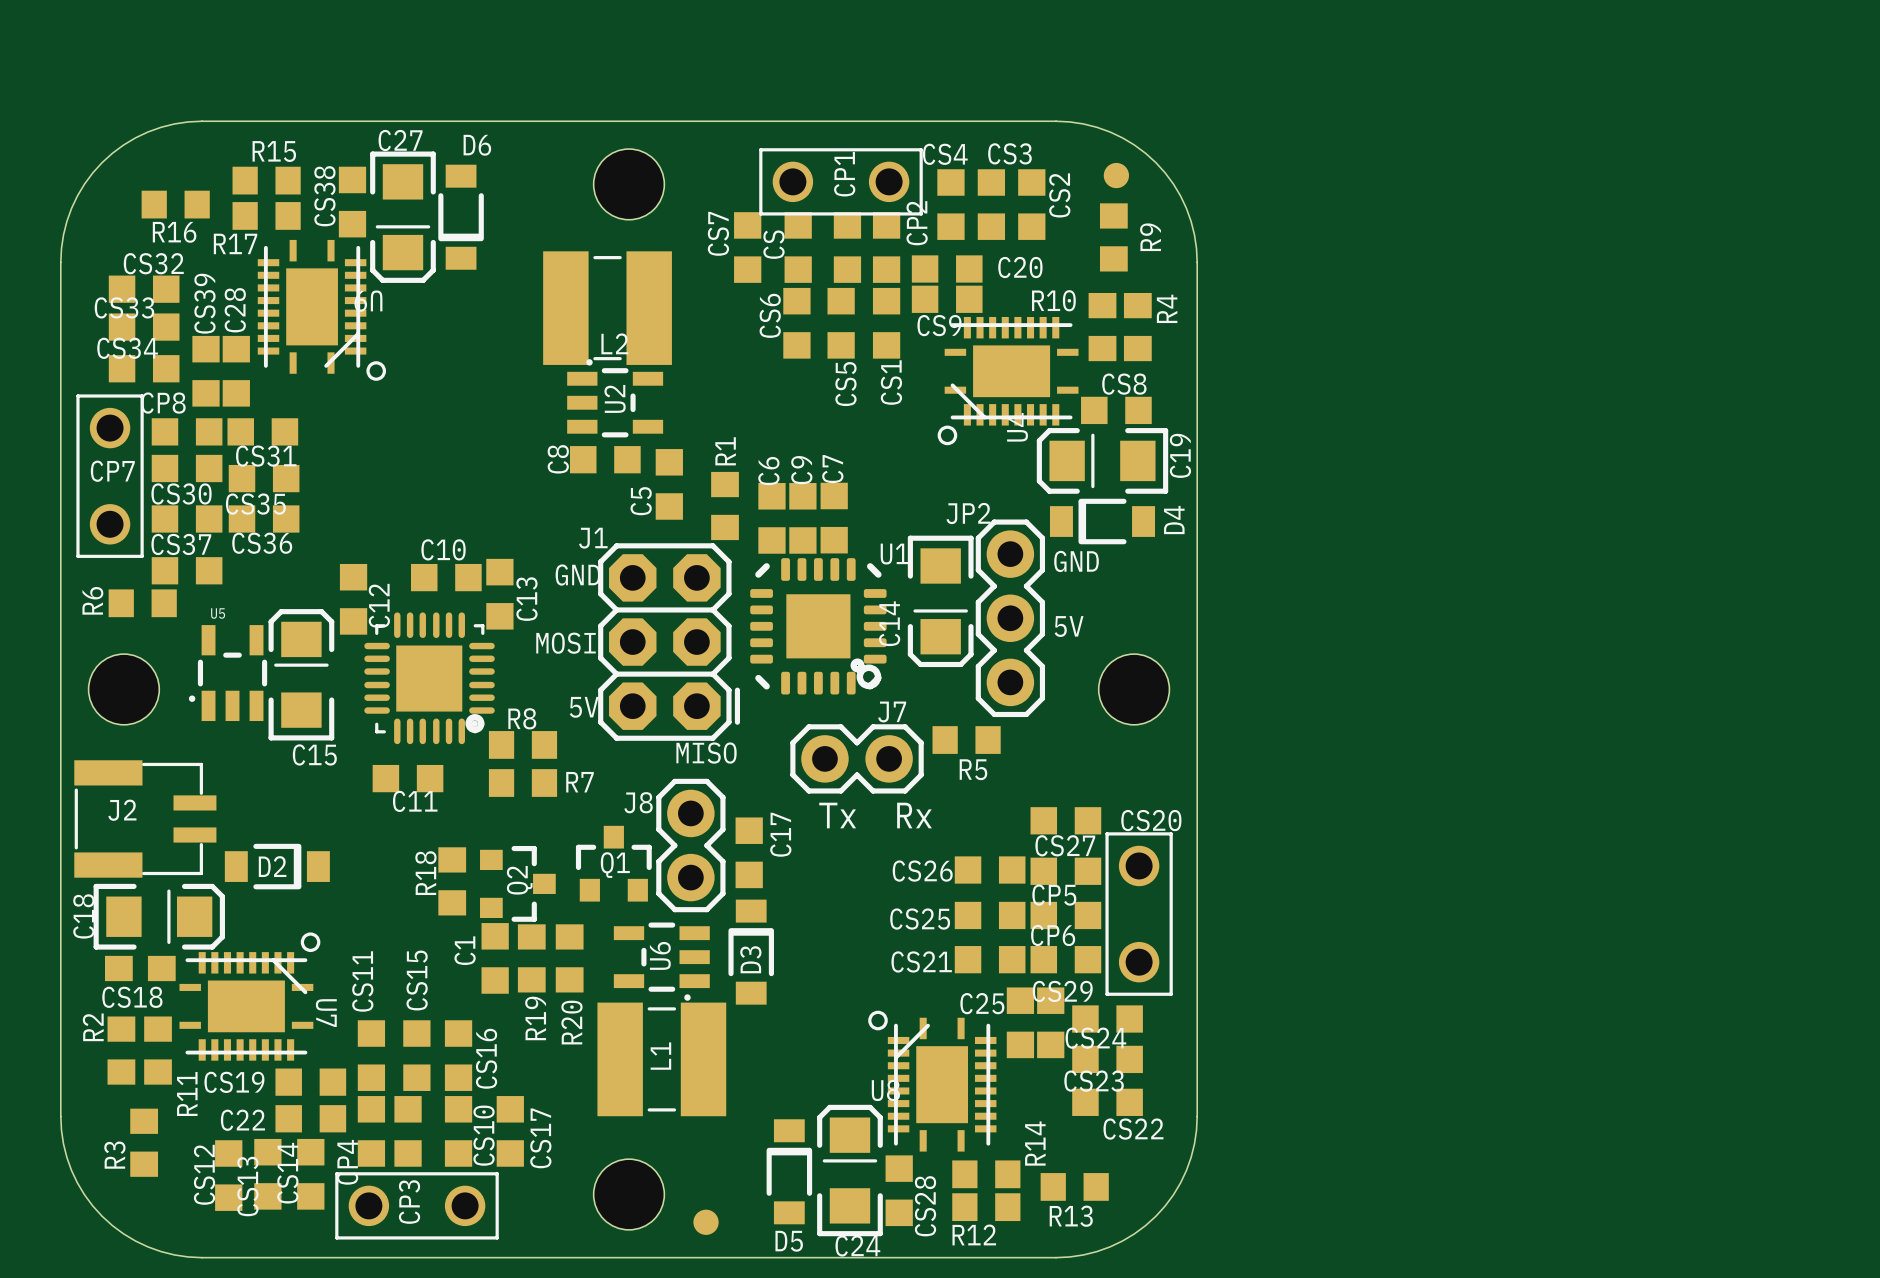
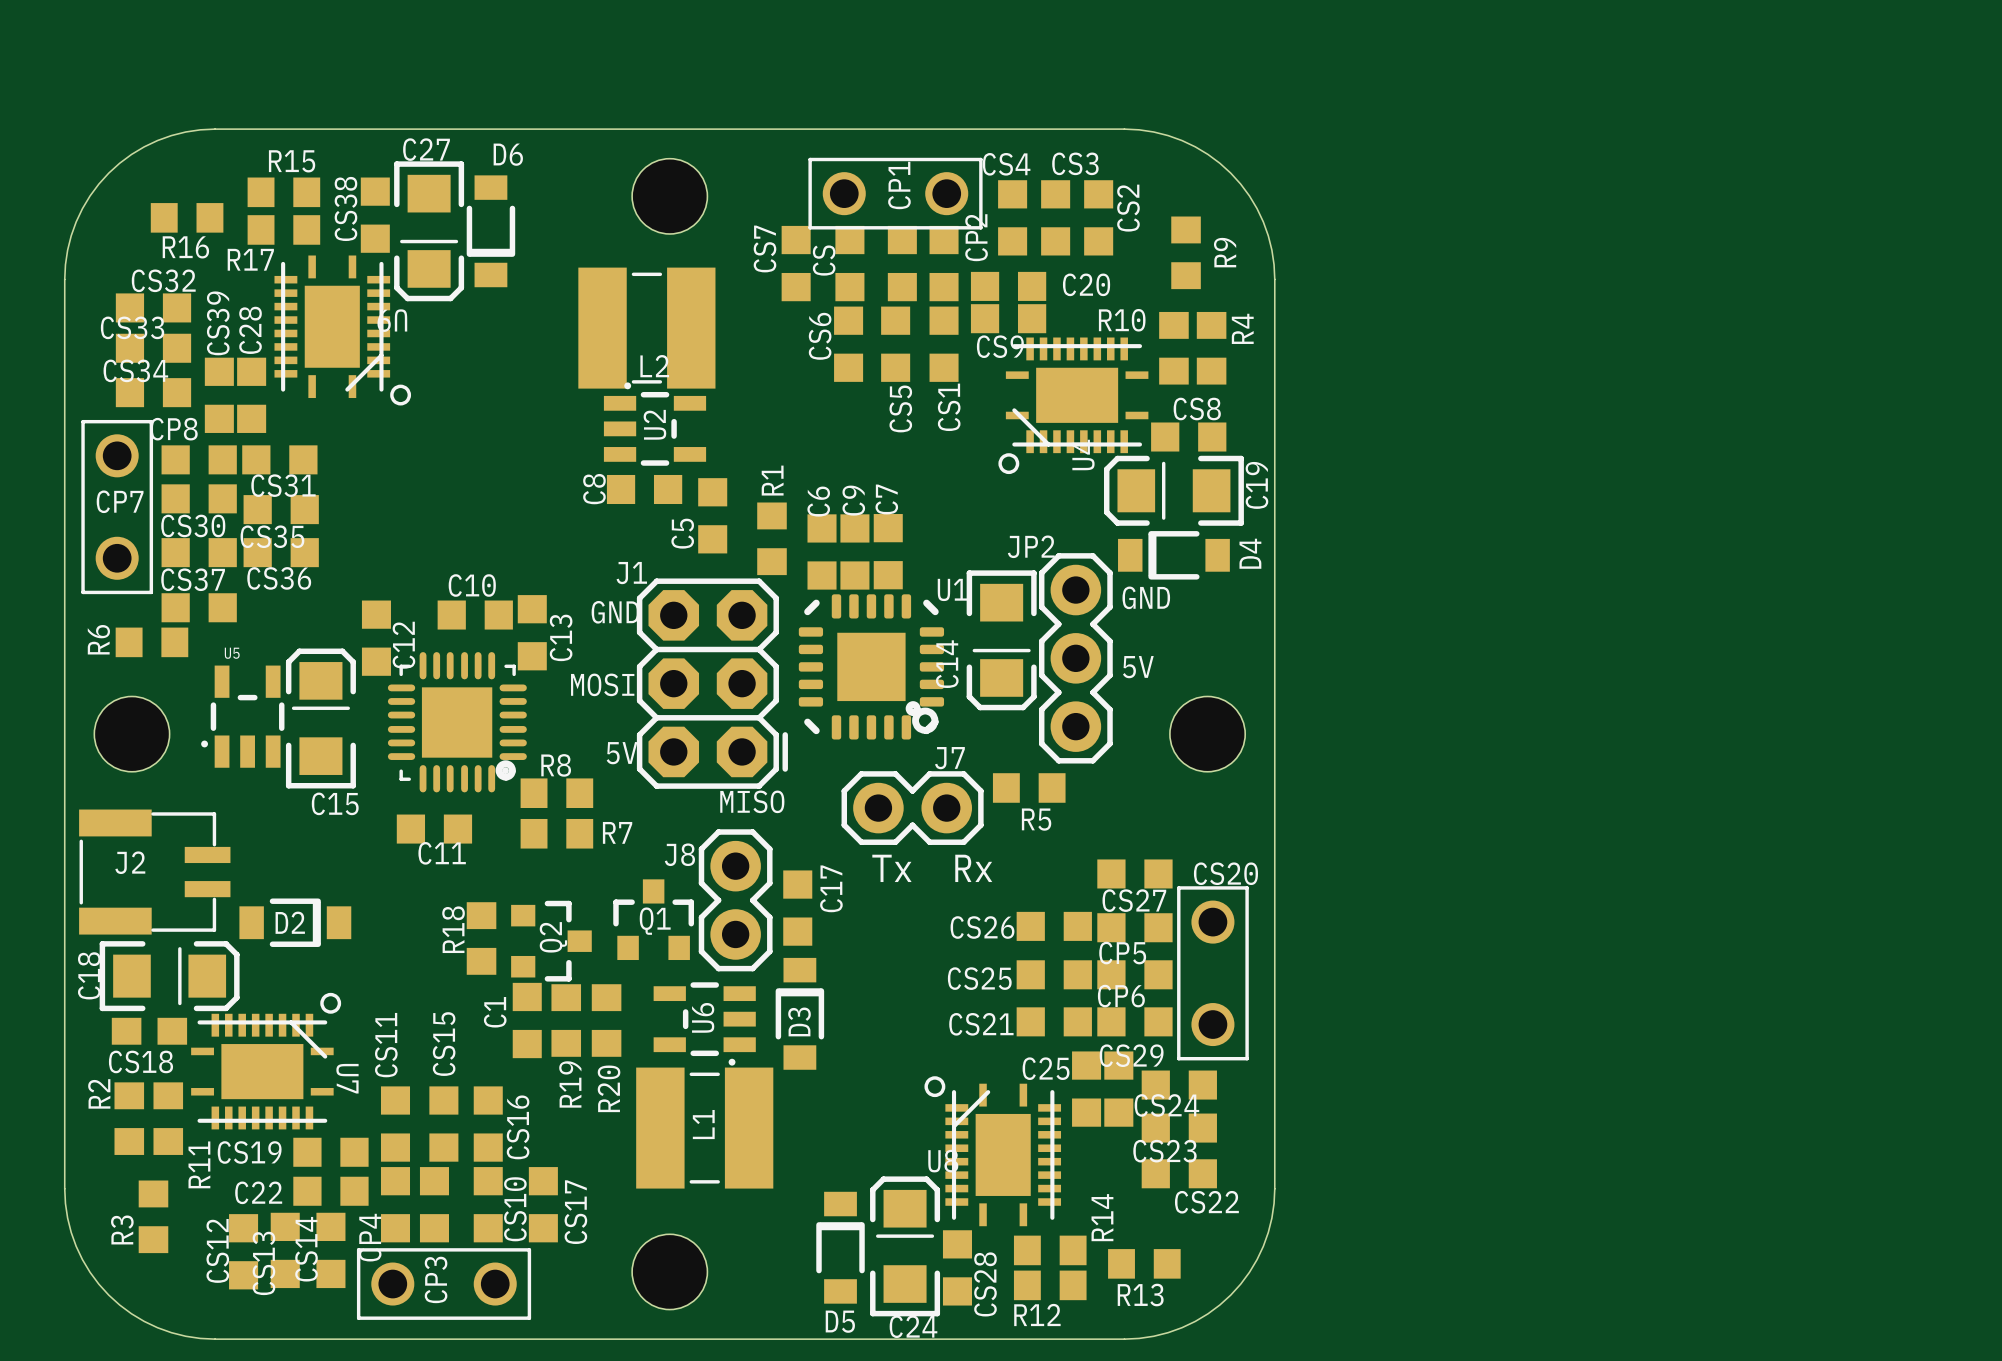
part: (1116, 175) -> none
part: (706, 1222) -> none

